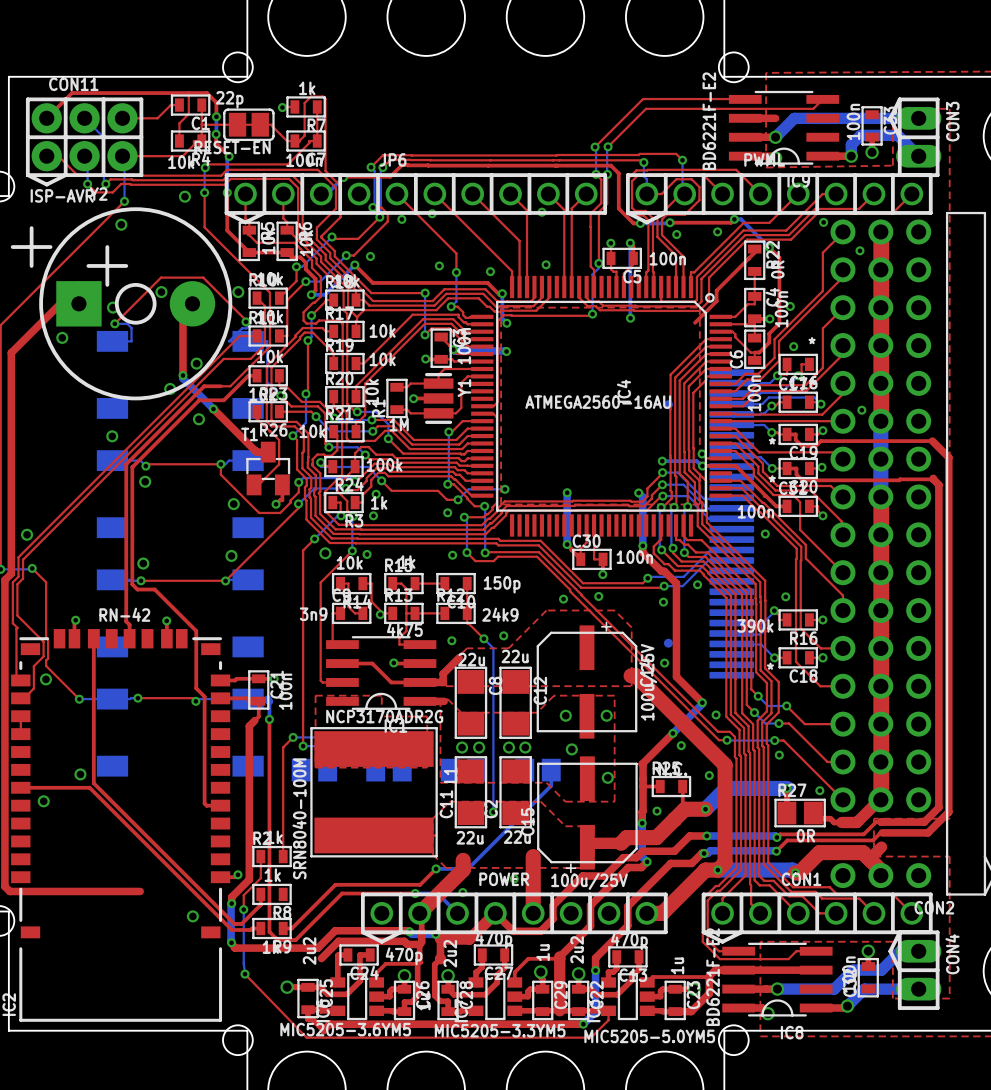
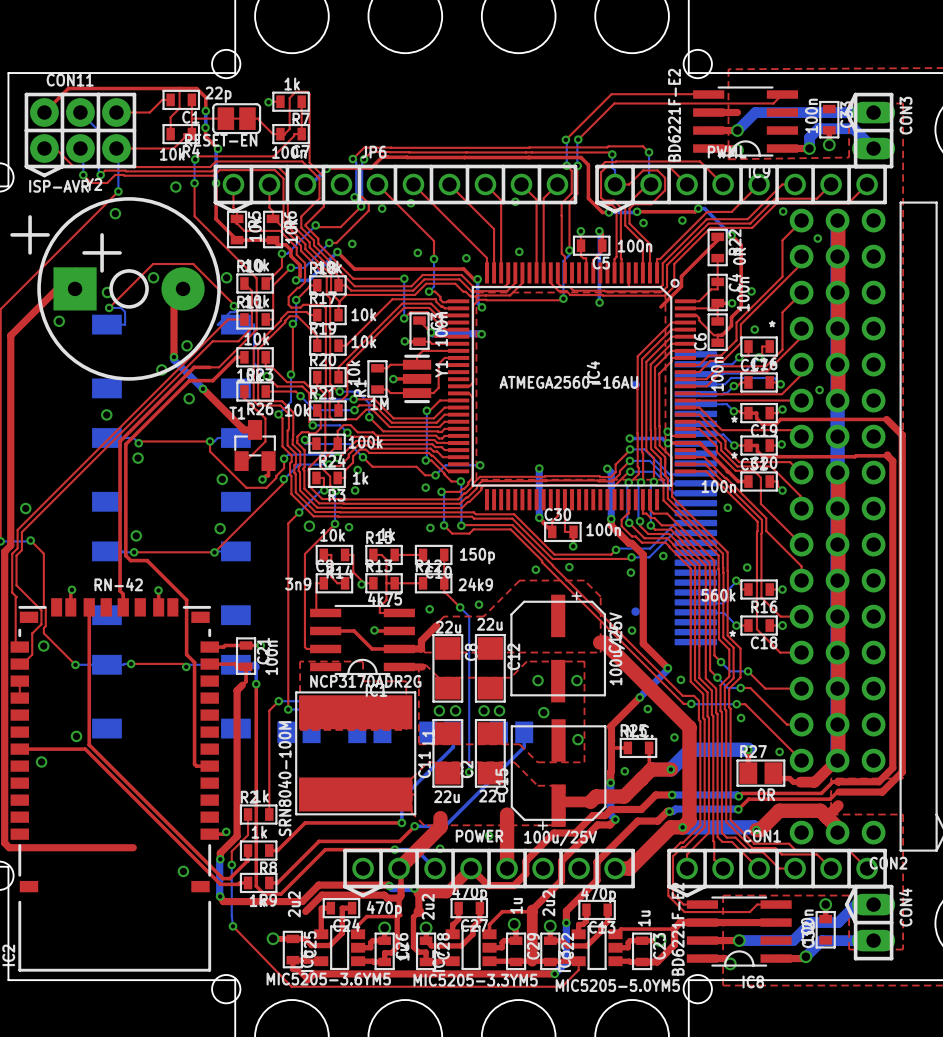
R16 value: 390k (755, 625) -> 560k (718, 595)
bottom track: none -> (453, 732) (453, 747) (401, 798) (401, 822)
top track: none -> (401, 822) (305, 822) (277, 850) (269, 850)
via: none -> (401, 822)

